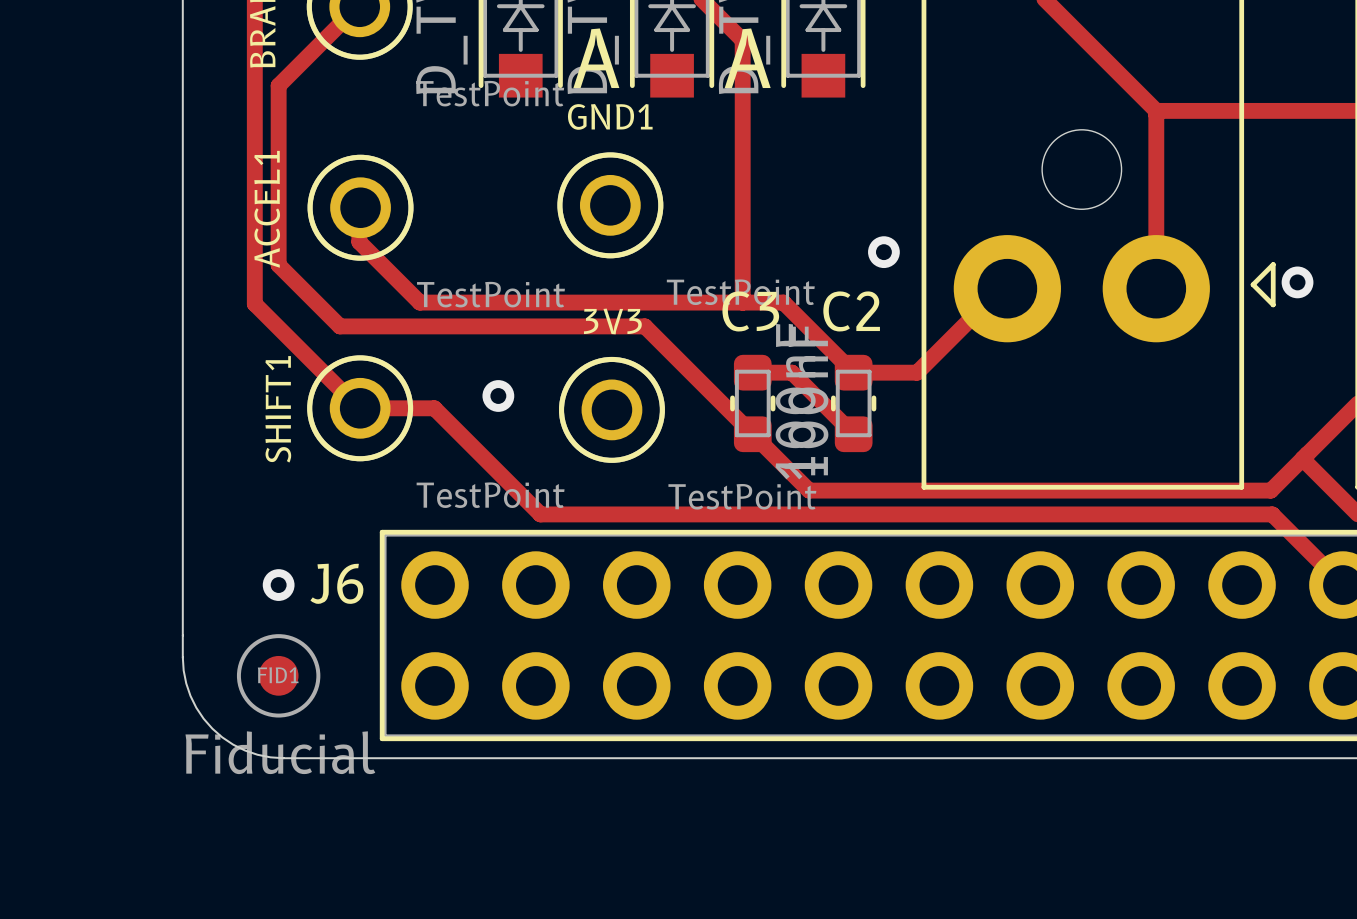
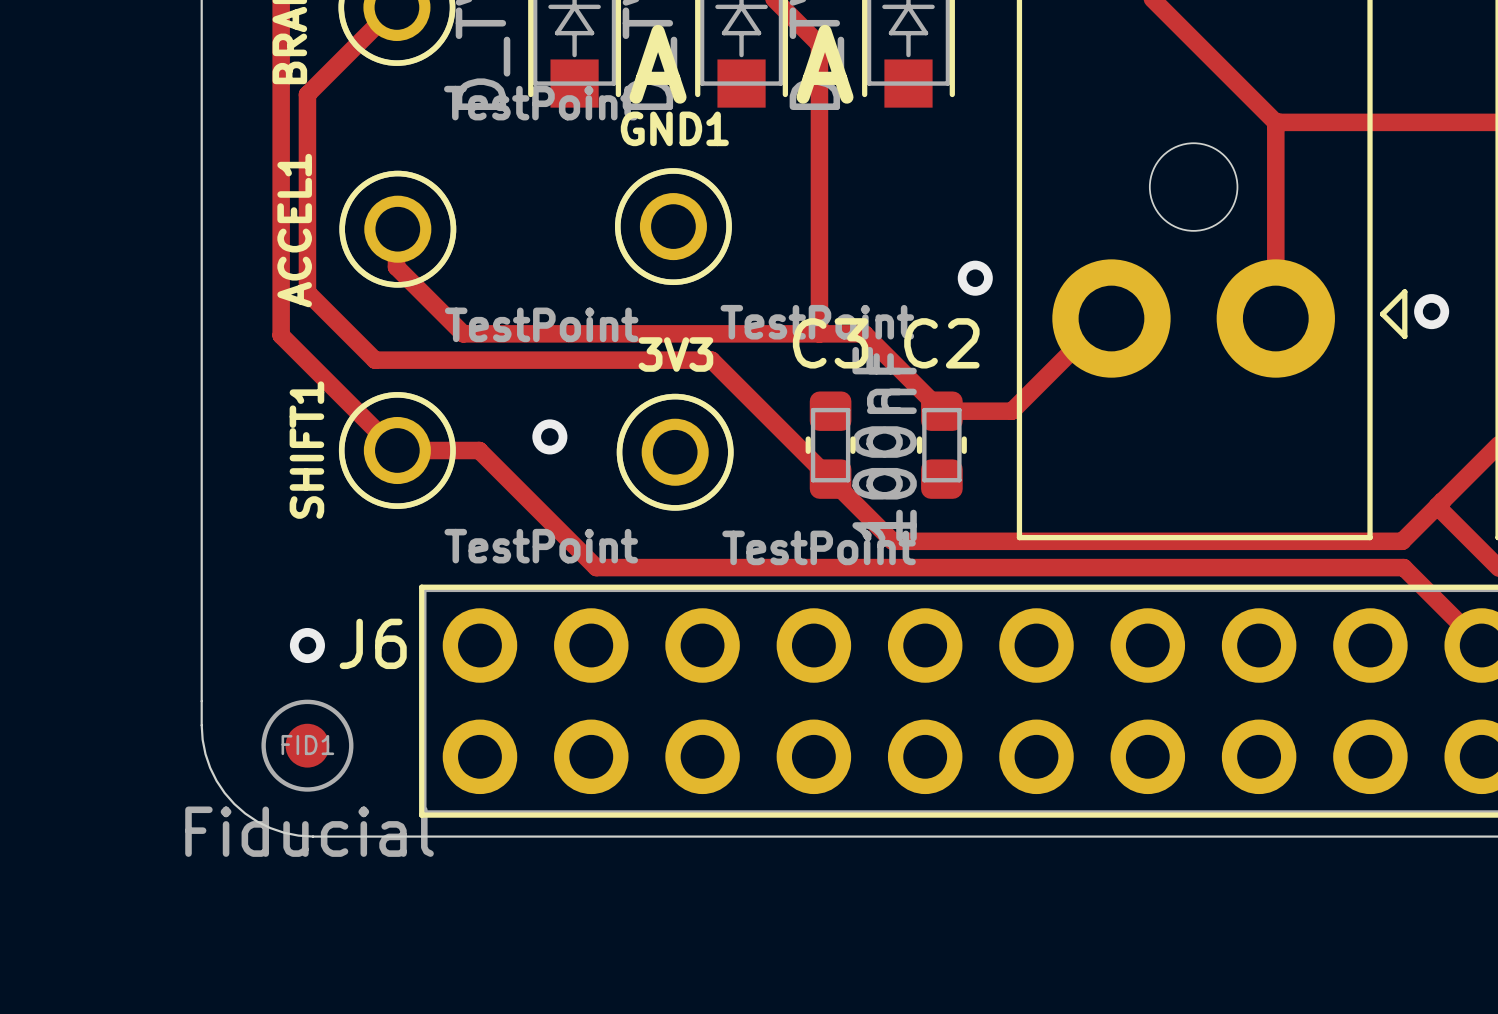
track: (752, 372) (792, 372) (853, 434) -> none

